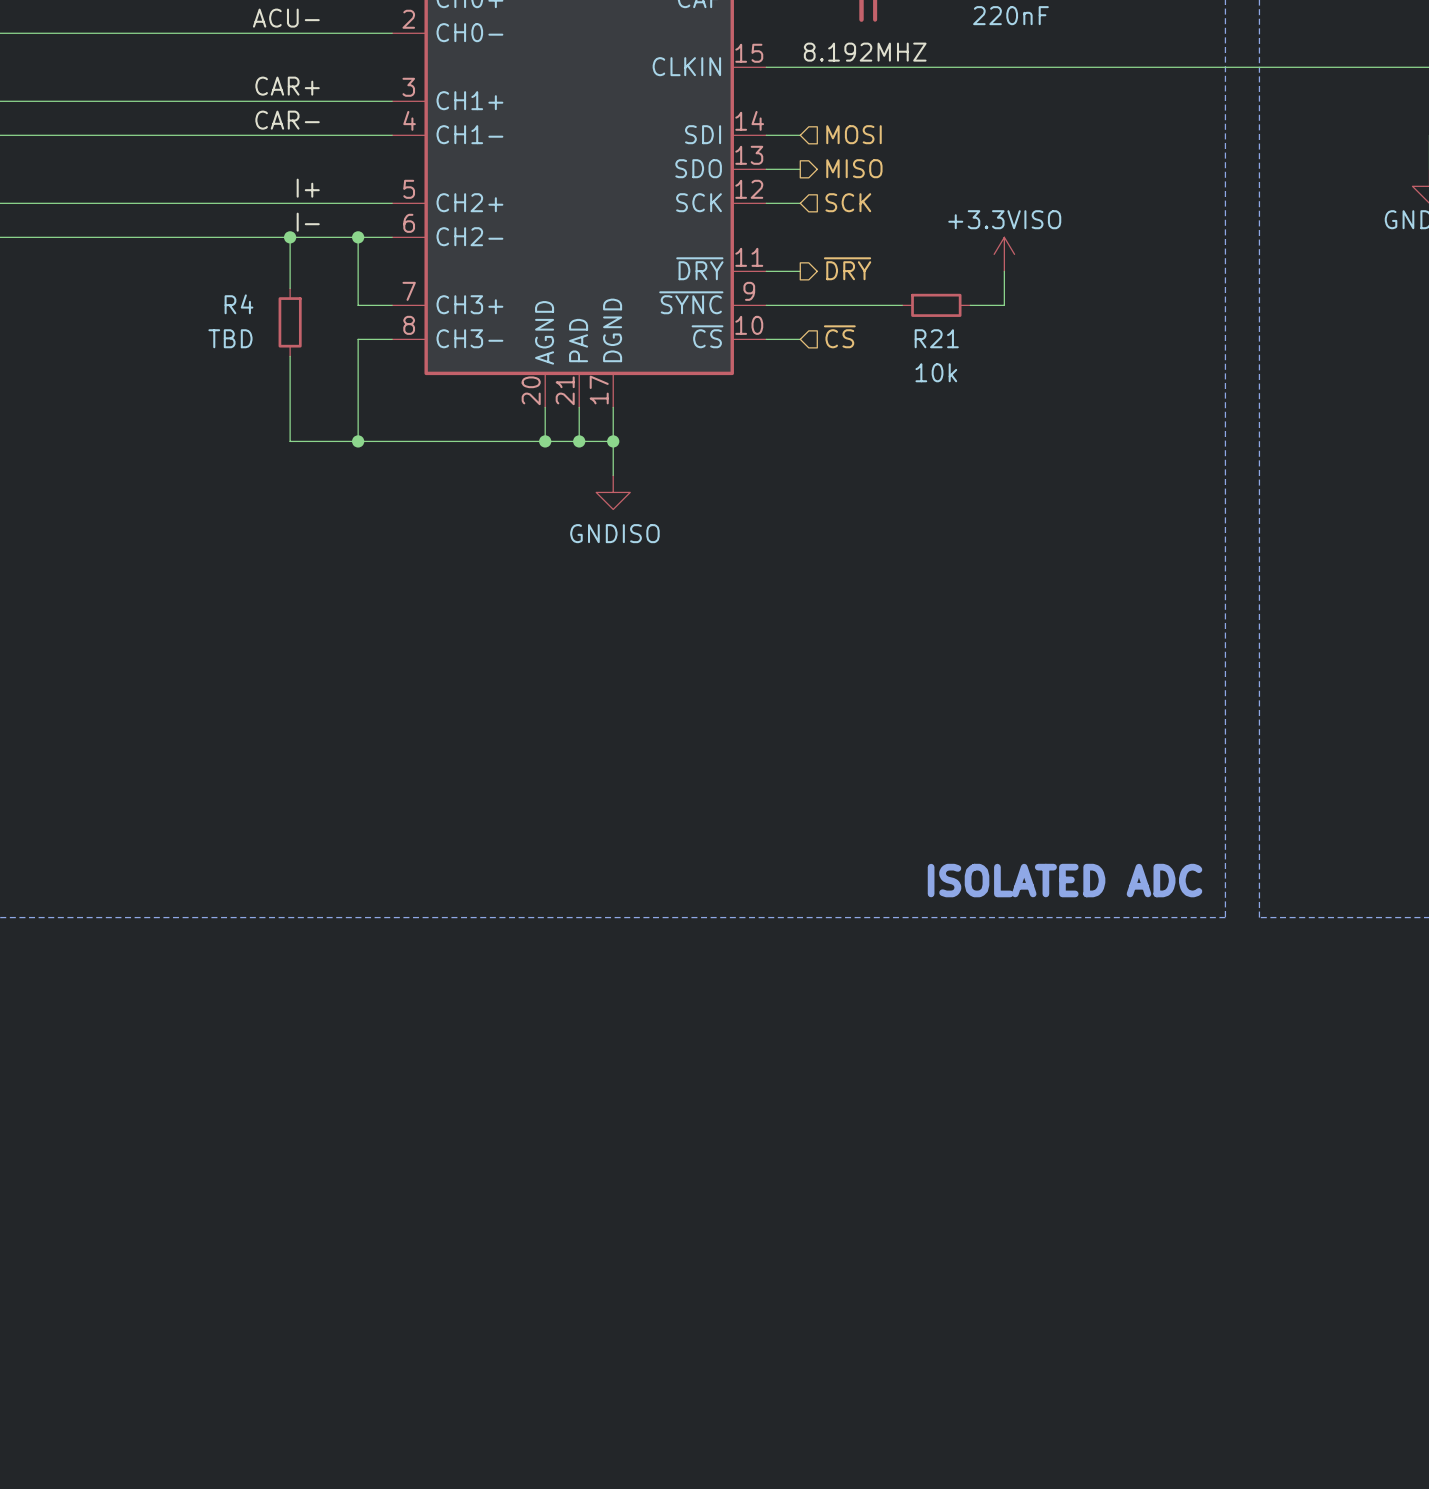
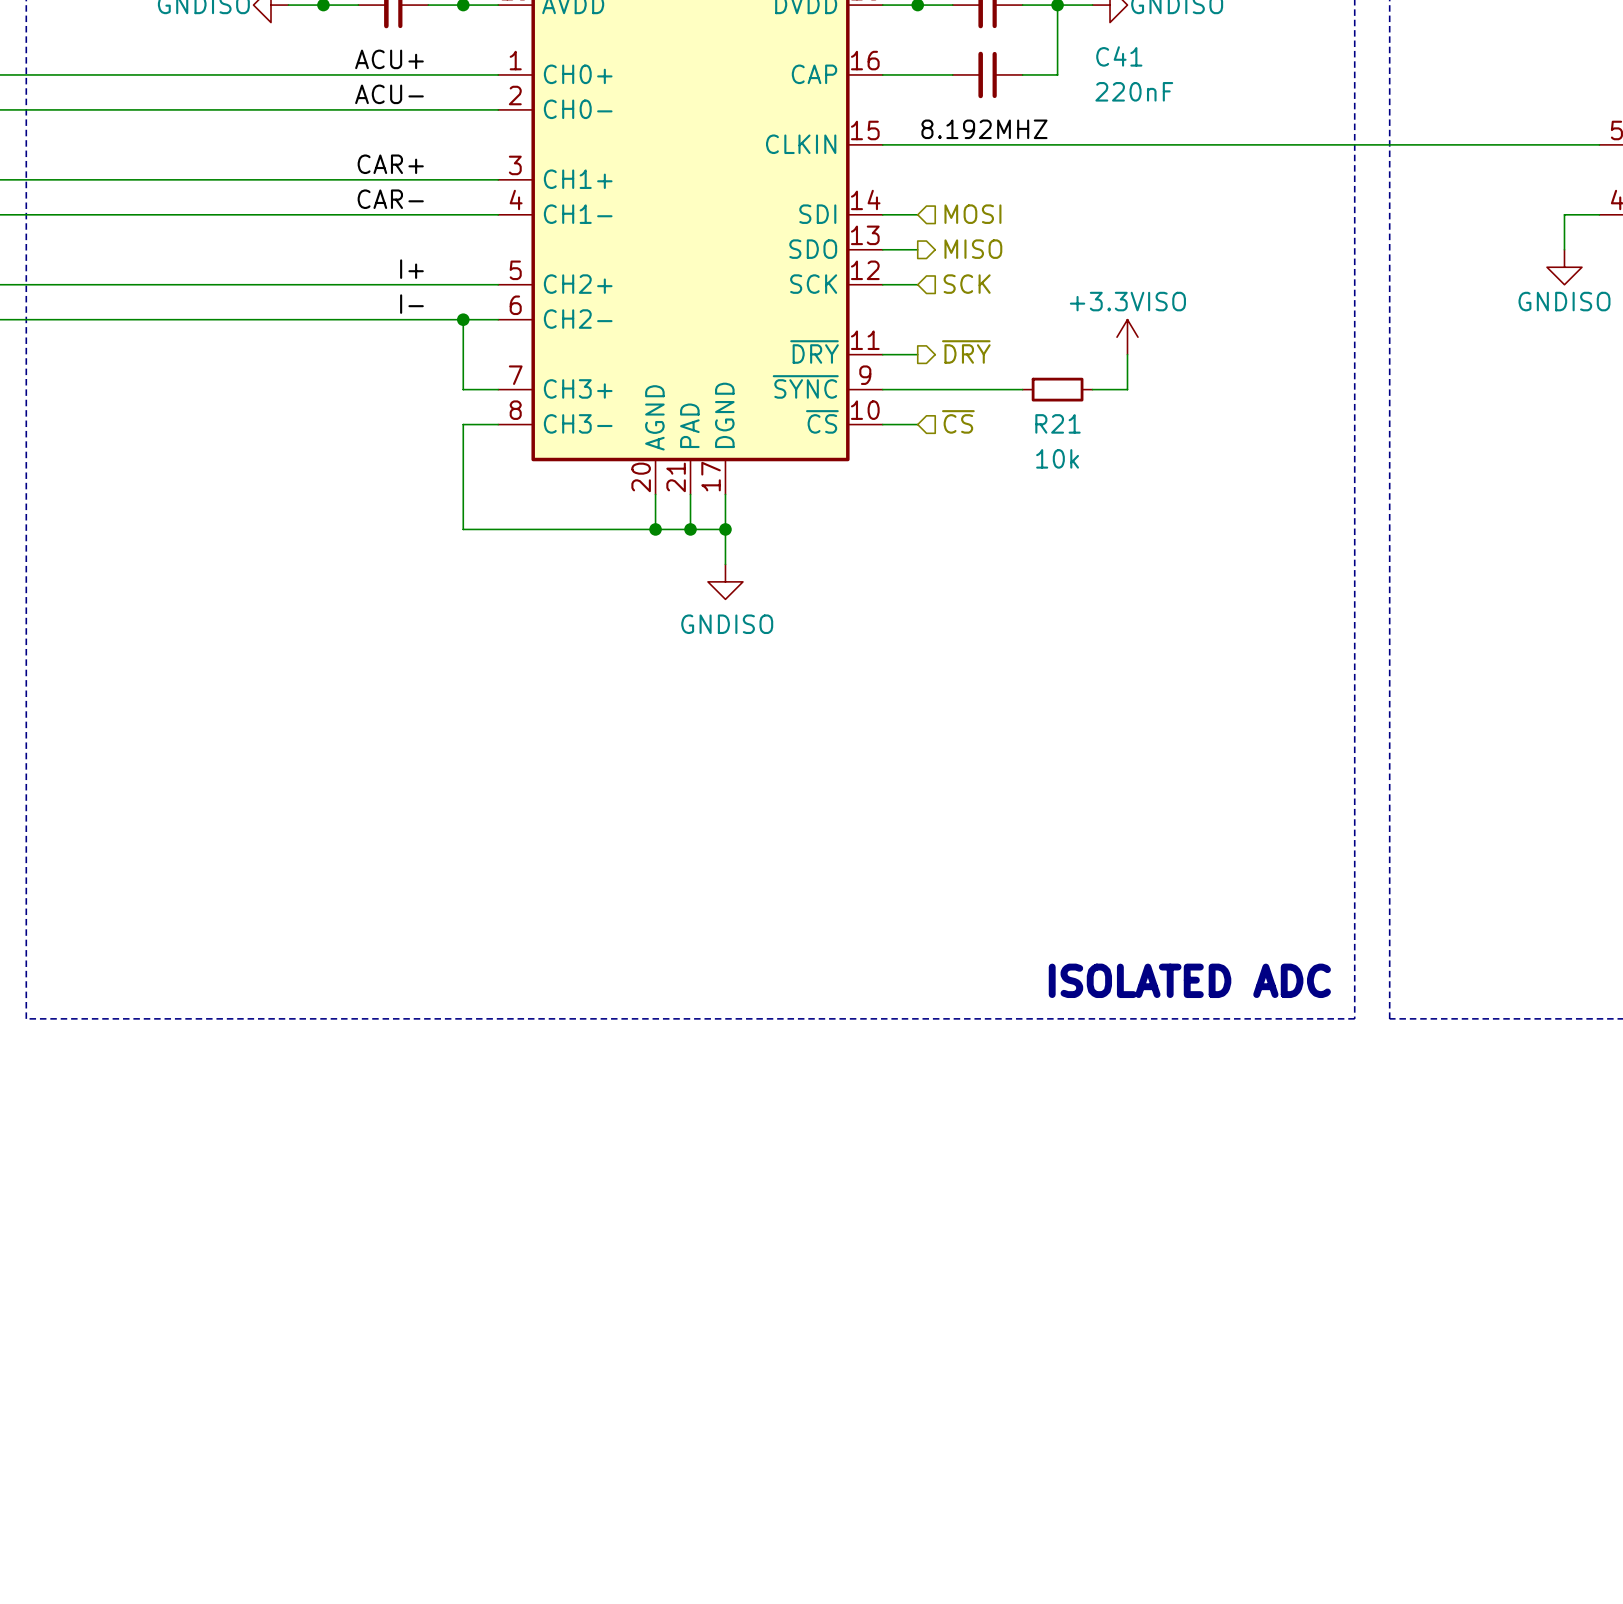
wire: (290, 237) (290, 288) -> none
junction: (290, 237) -> none
R4: TBD (290, 322) -> none
wire: (290, 356) (290, 441) (358, 441) -> none
junction: (358, 441) -> none

